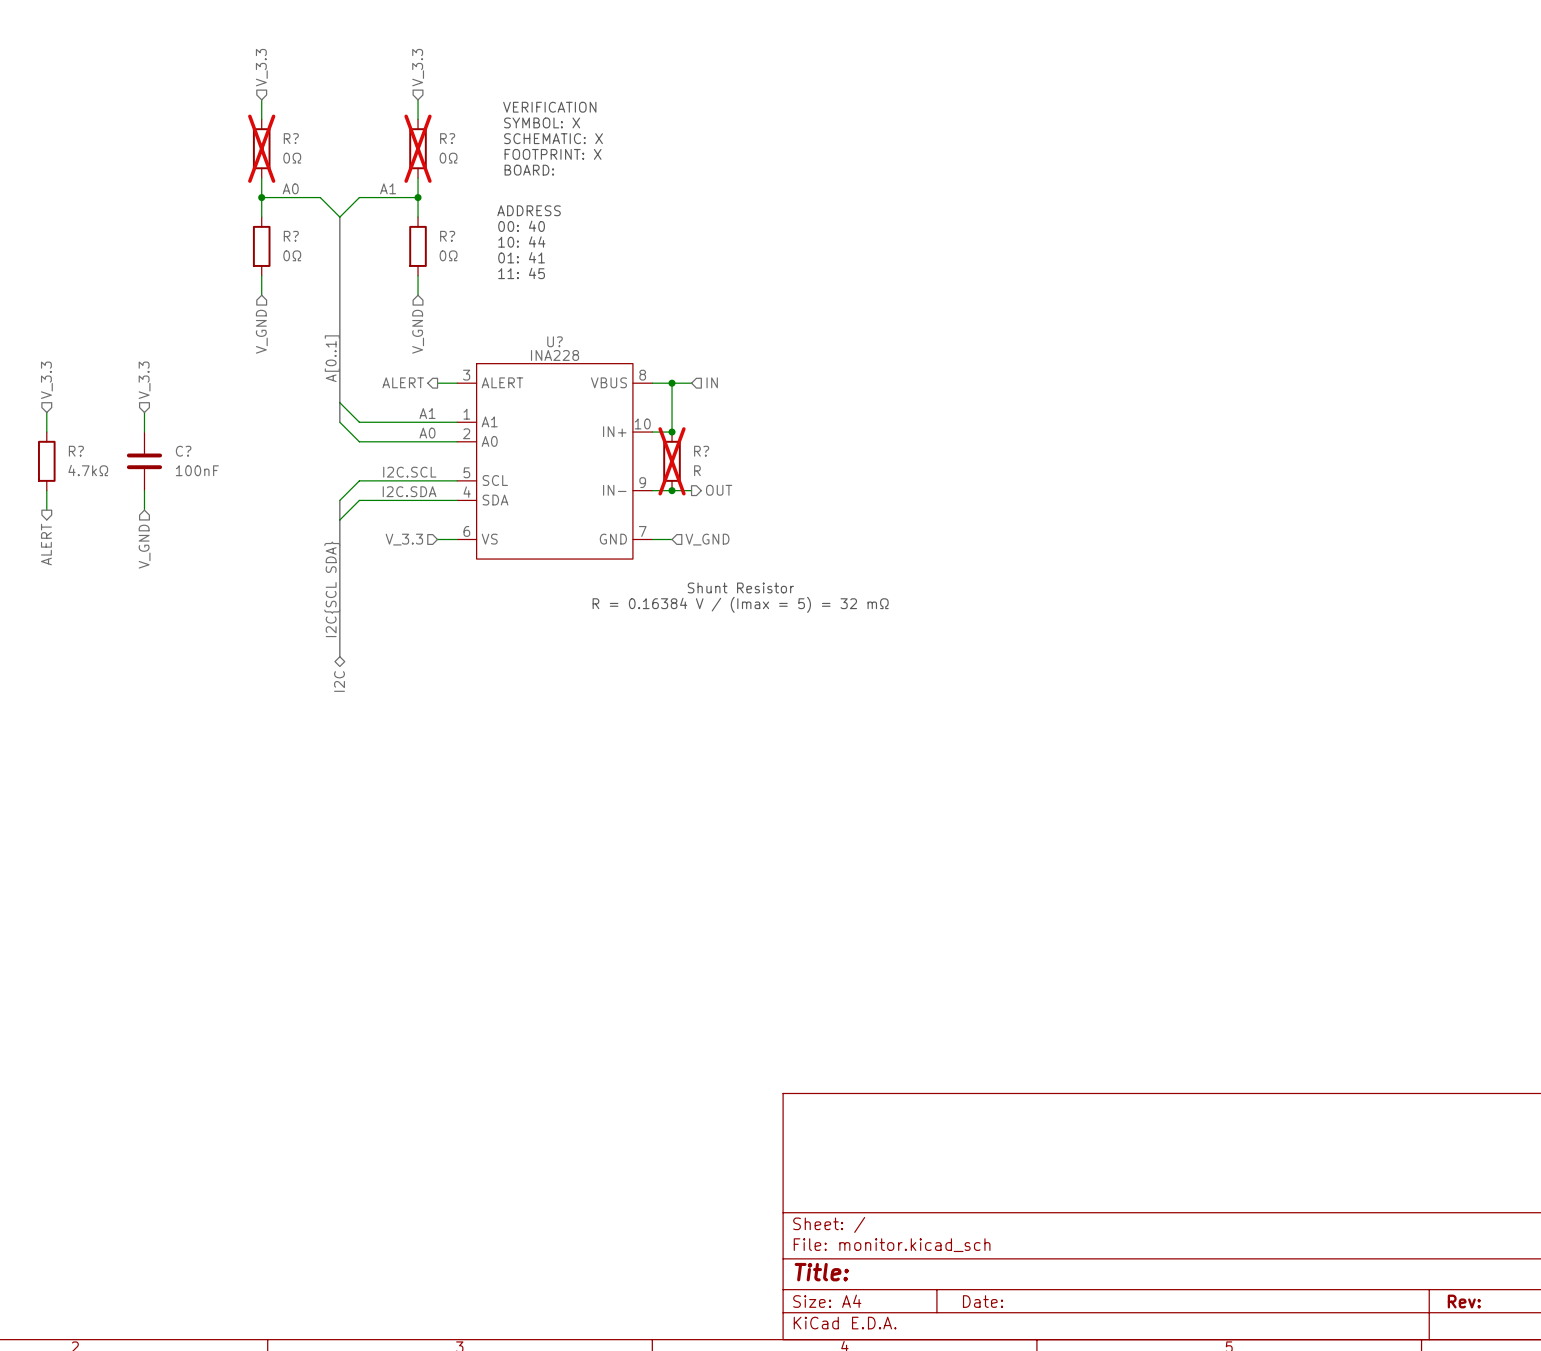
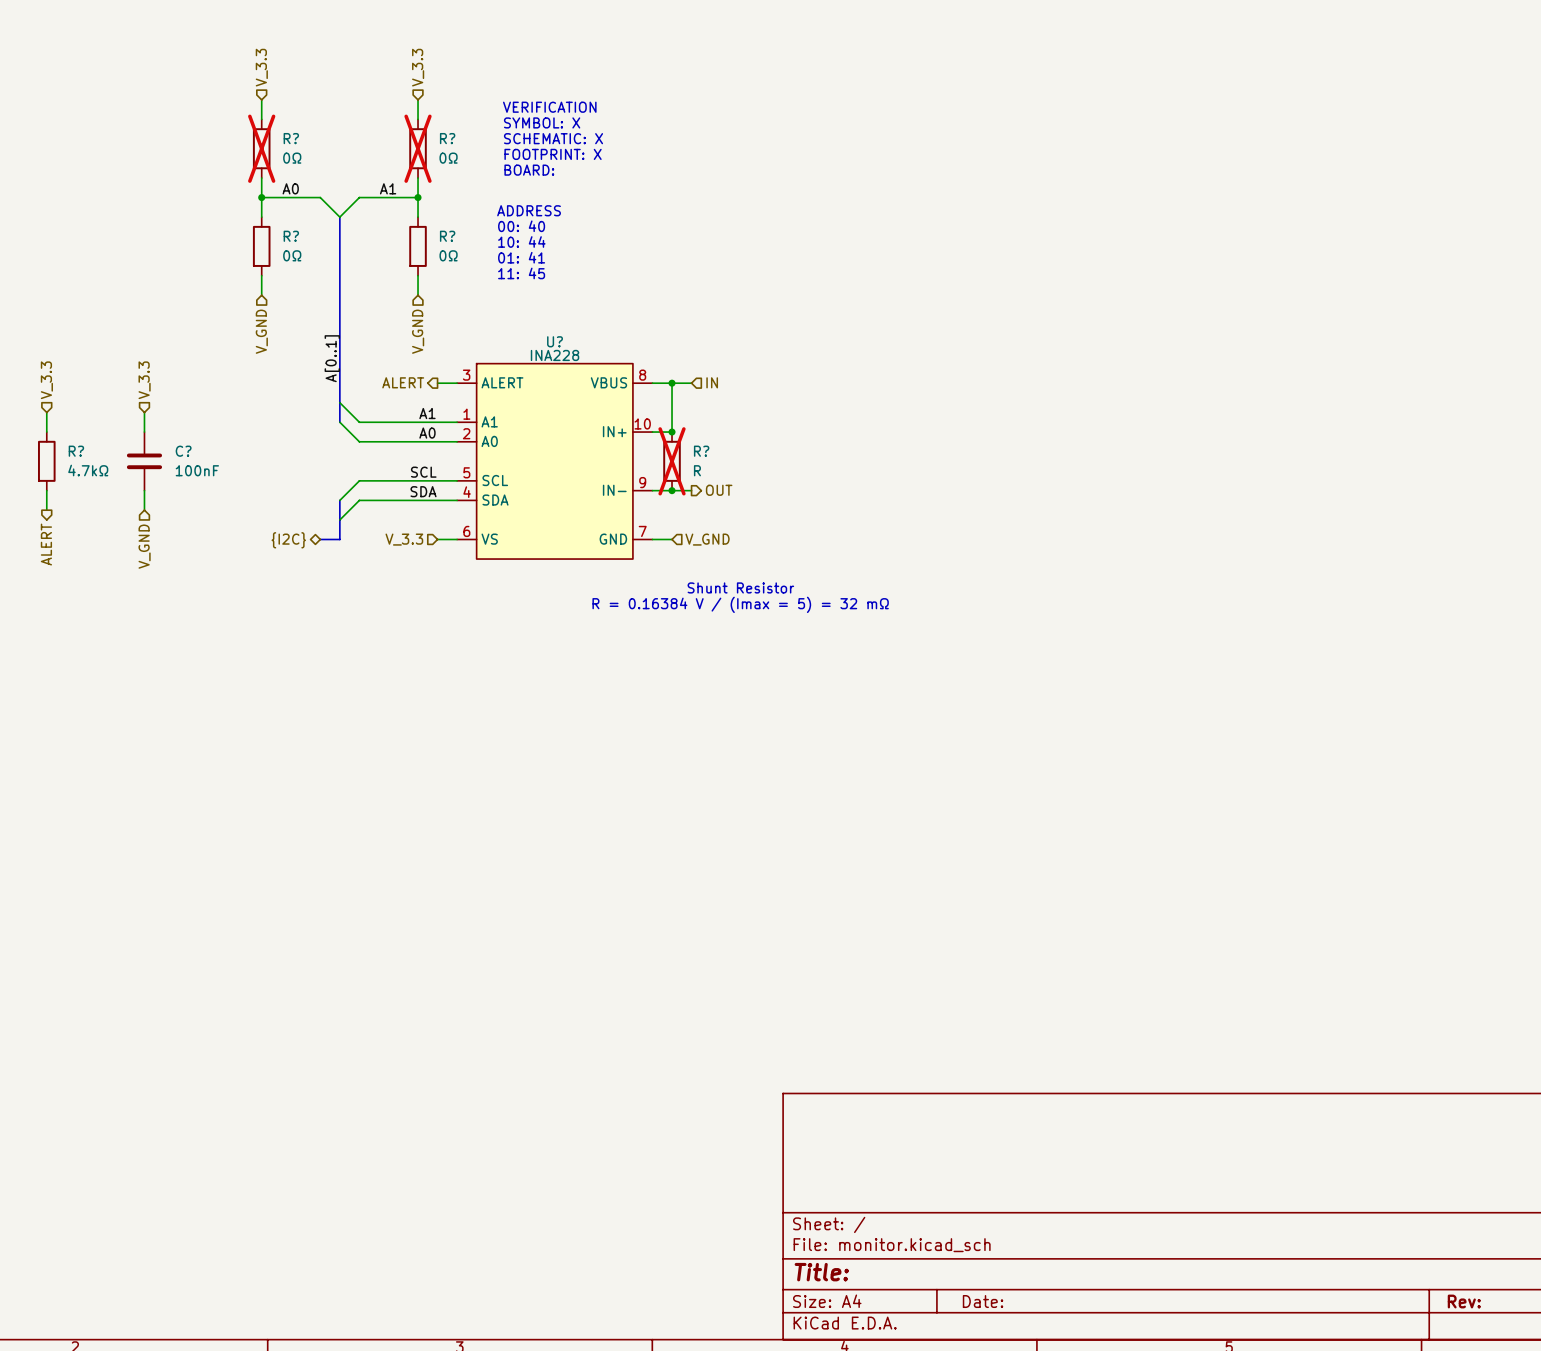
label: I2C.SCL (409, 472) -> SCL (423, 472)
label: I2C.SDA (409, 491) -> SDA (423, 491)
bus: (339, 539) (339, 656) -> (339, 539) (320, 539)
hierarchical label: none -> {I2C} (288, 540)
label: I2C{SCL SDA} (332, 589) -> none
hierarchical label: I2C (339, 681) -> none

